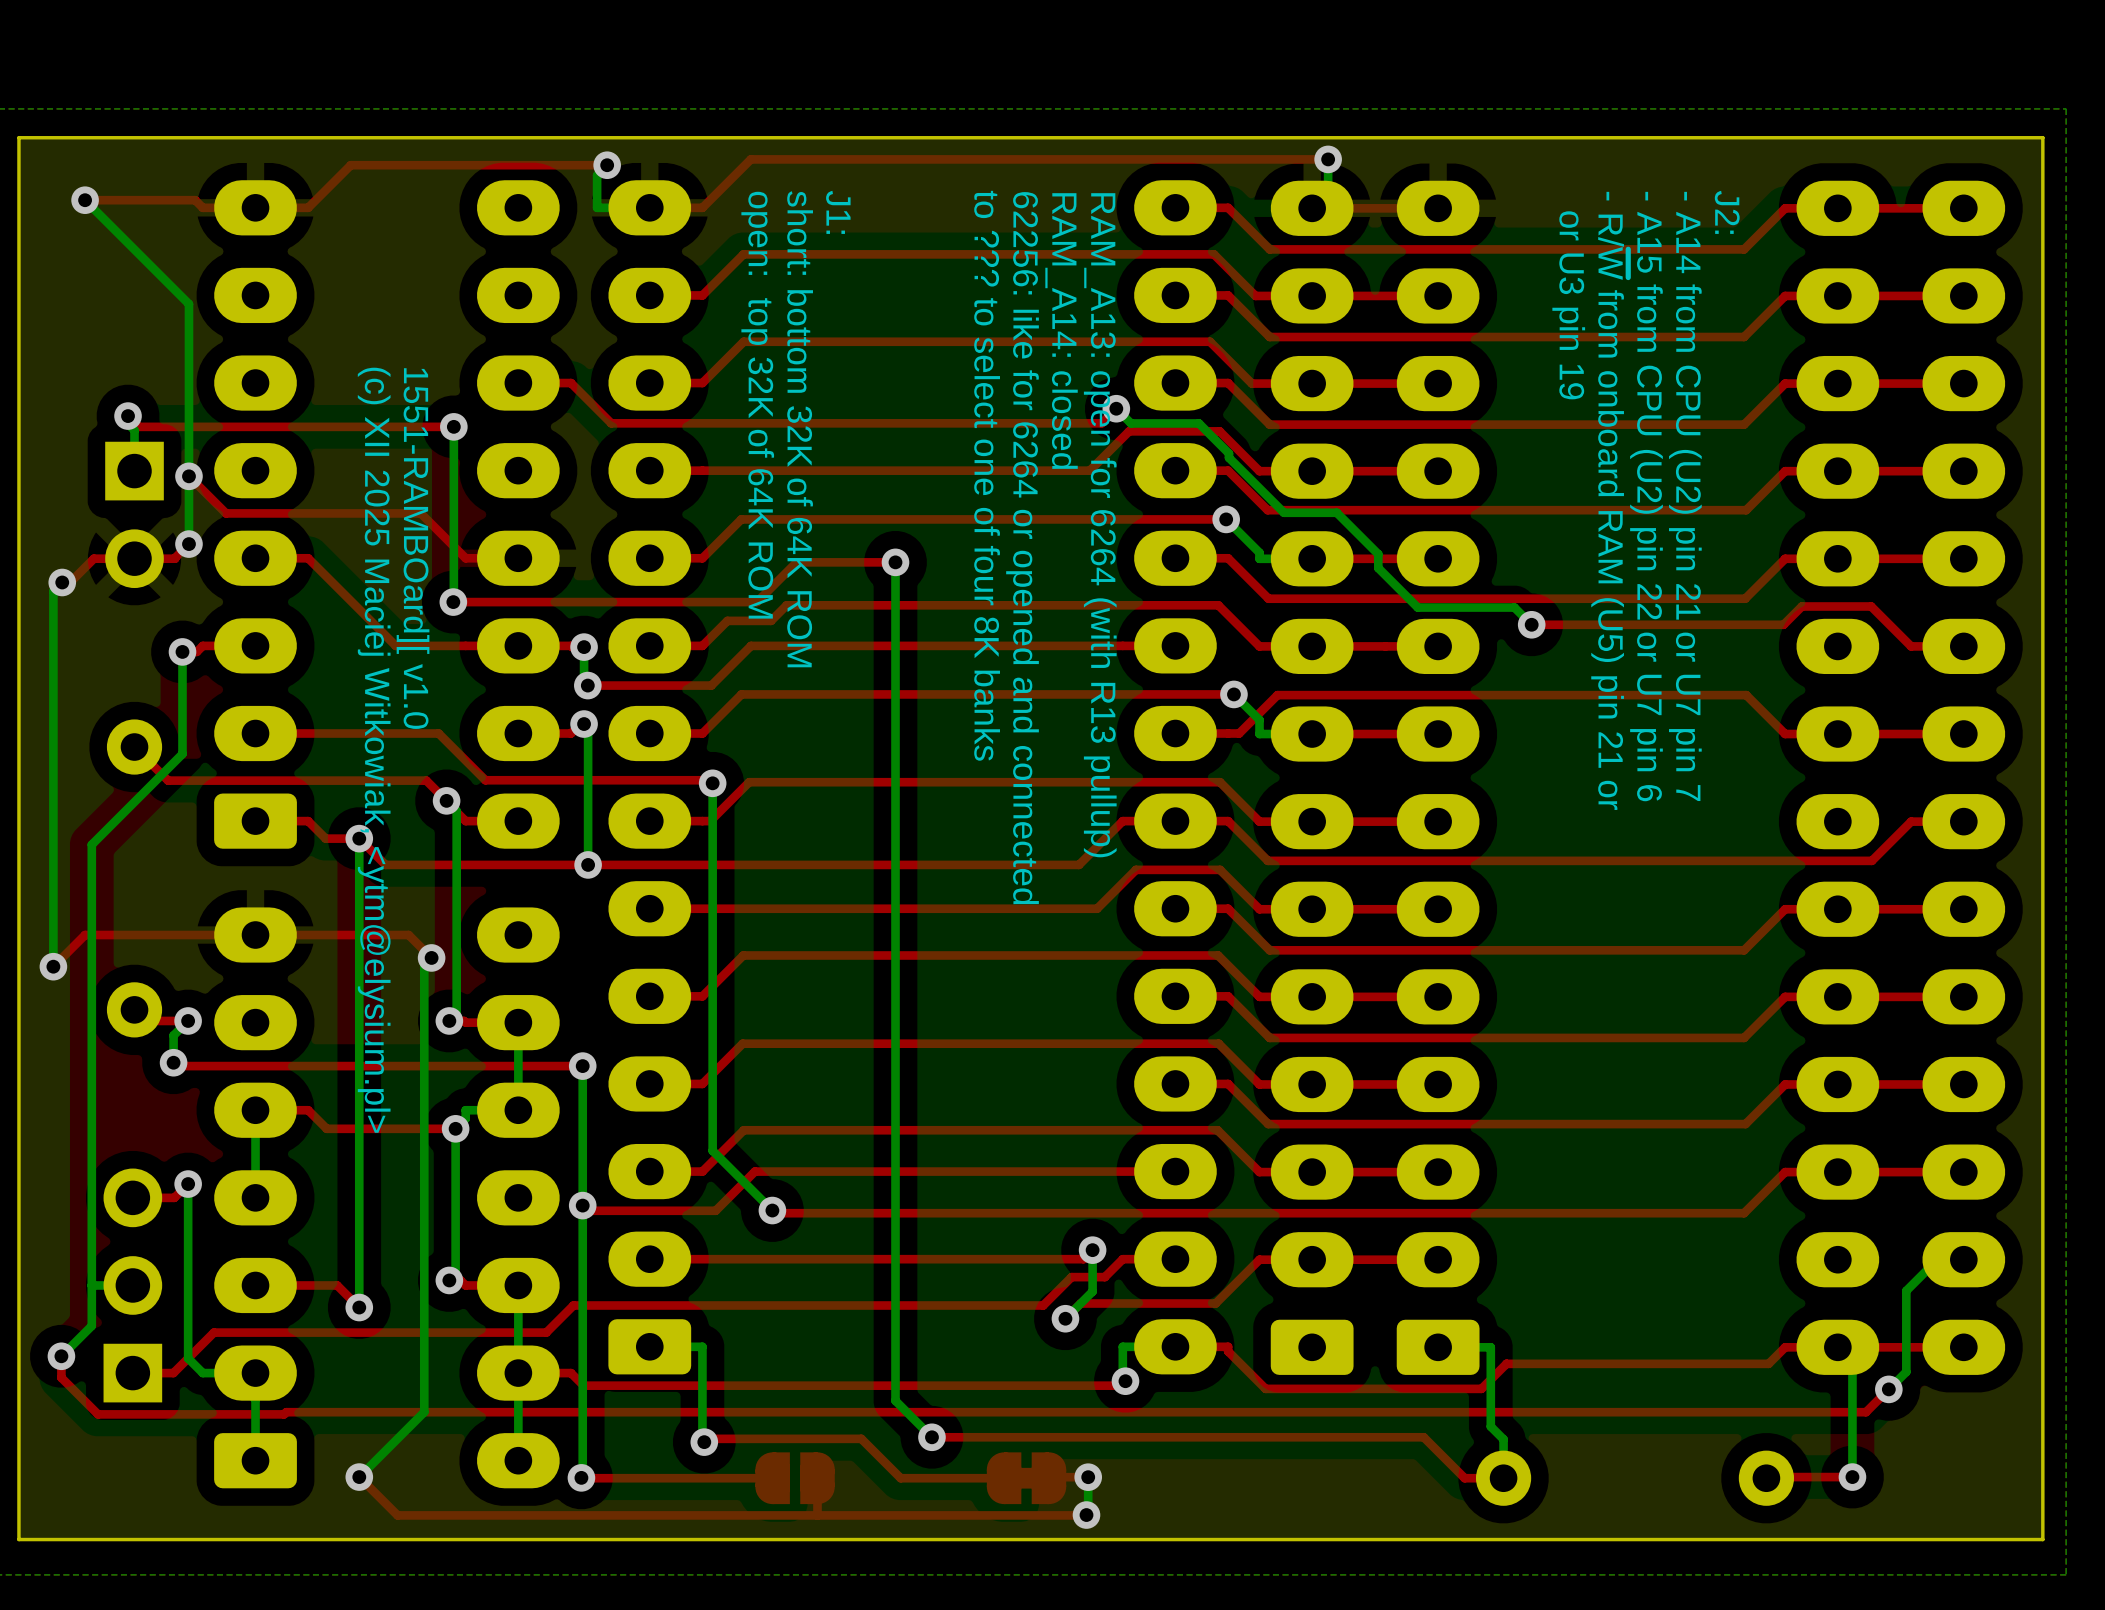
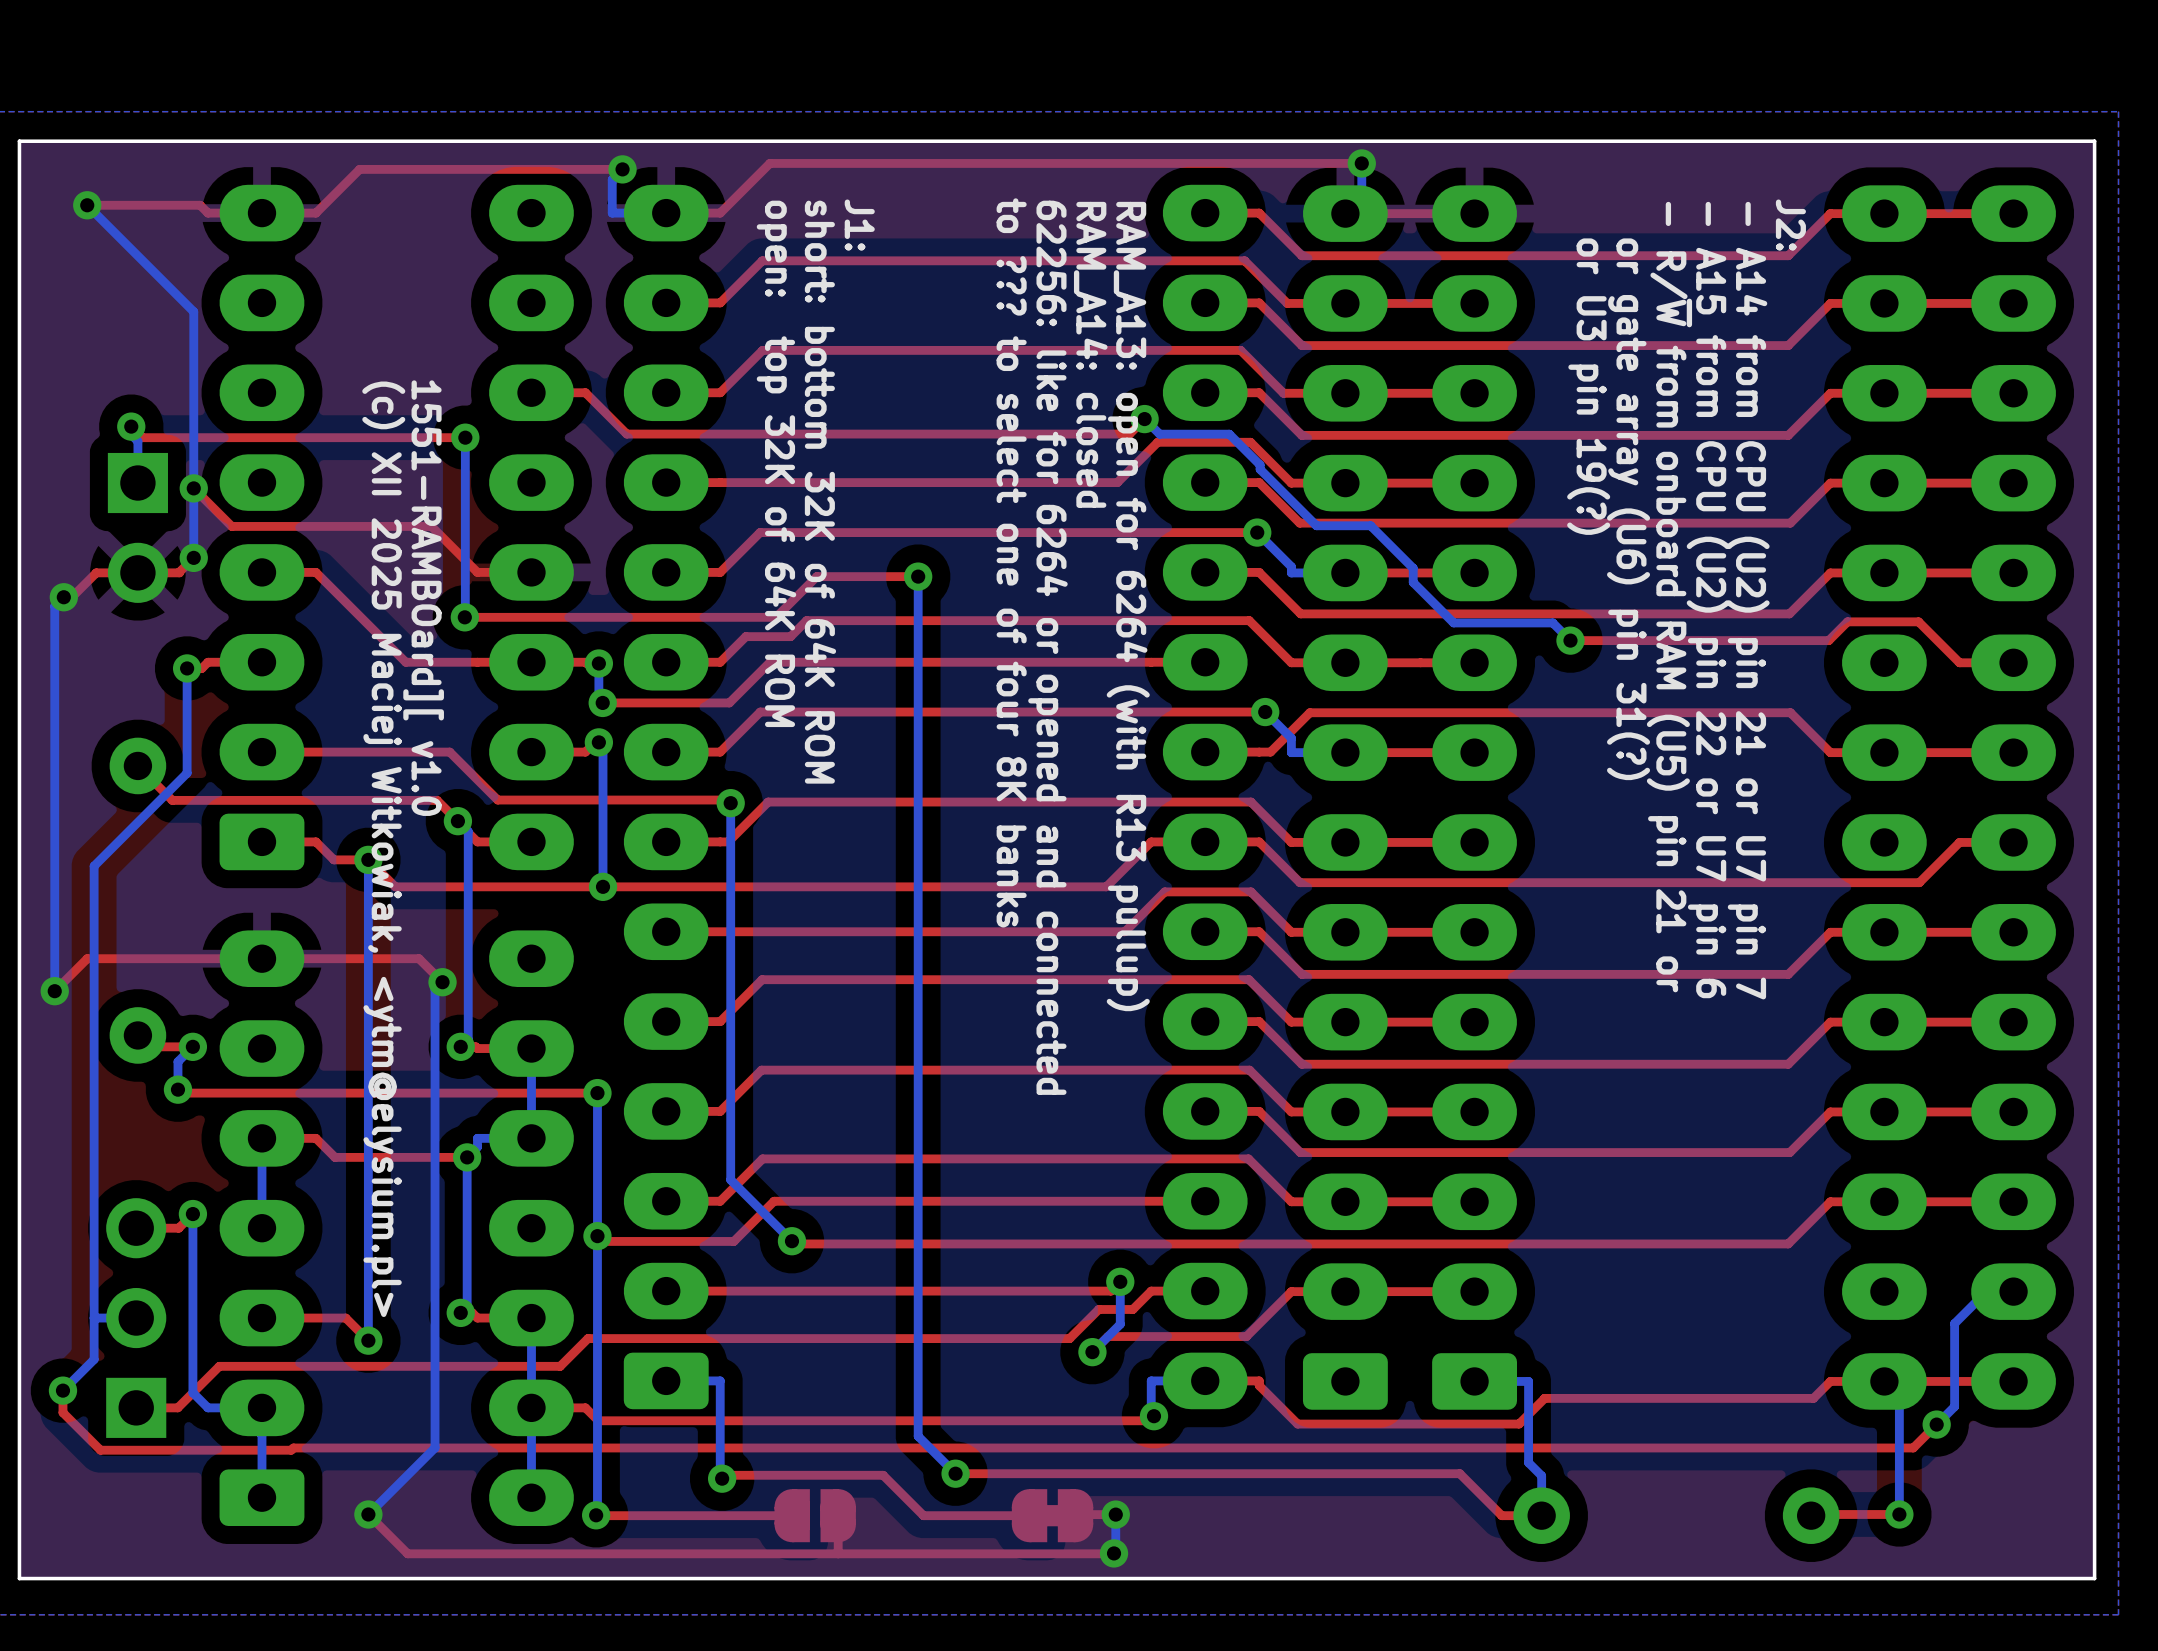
text position: J2: (1727, 212) -> J2: (1790, 225)
text: or U3 pin 19 (1568, 305) -> or U3 pin 19(?) (1588, 386)
text: none -> or gate array (U6) pin 31(?) (1628, 509)
text position: - A15 from CPU (U2) pin 22 or U7 pin 6 (1646, 496) -> - A15 from CPU (U2) pin 22 or U7 pin 6 (1708, 600)
text position: - A14 from CPU (U2) pin 21 or U7 pin 7 (1685, 496) -> - A14 from CPU (U2) pin 21 or U7 pin 7 (1748, 600)
text position: - R/~{W} from onboard RAM (U5) pin 21 or (1609, 500) -> - R/~{W} from onboard RAM (U5) pin 21 or (1669, 597)

